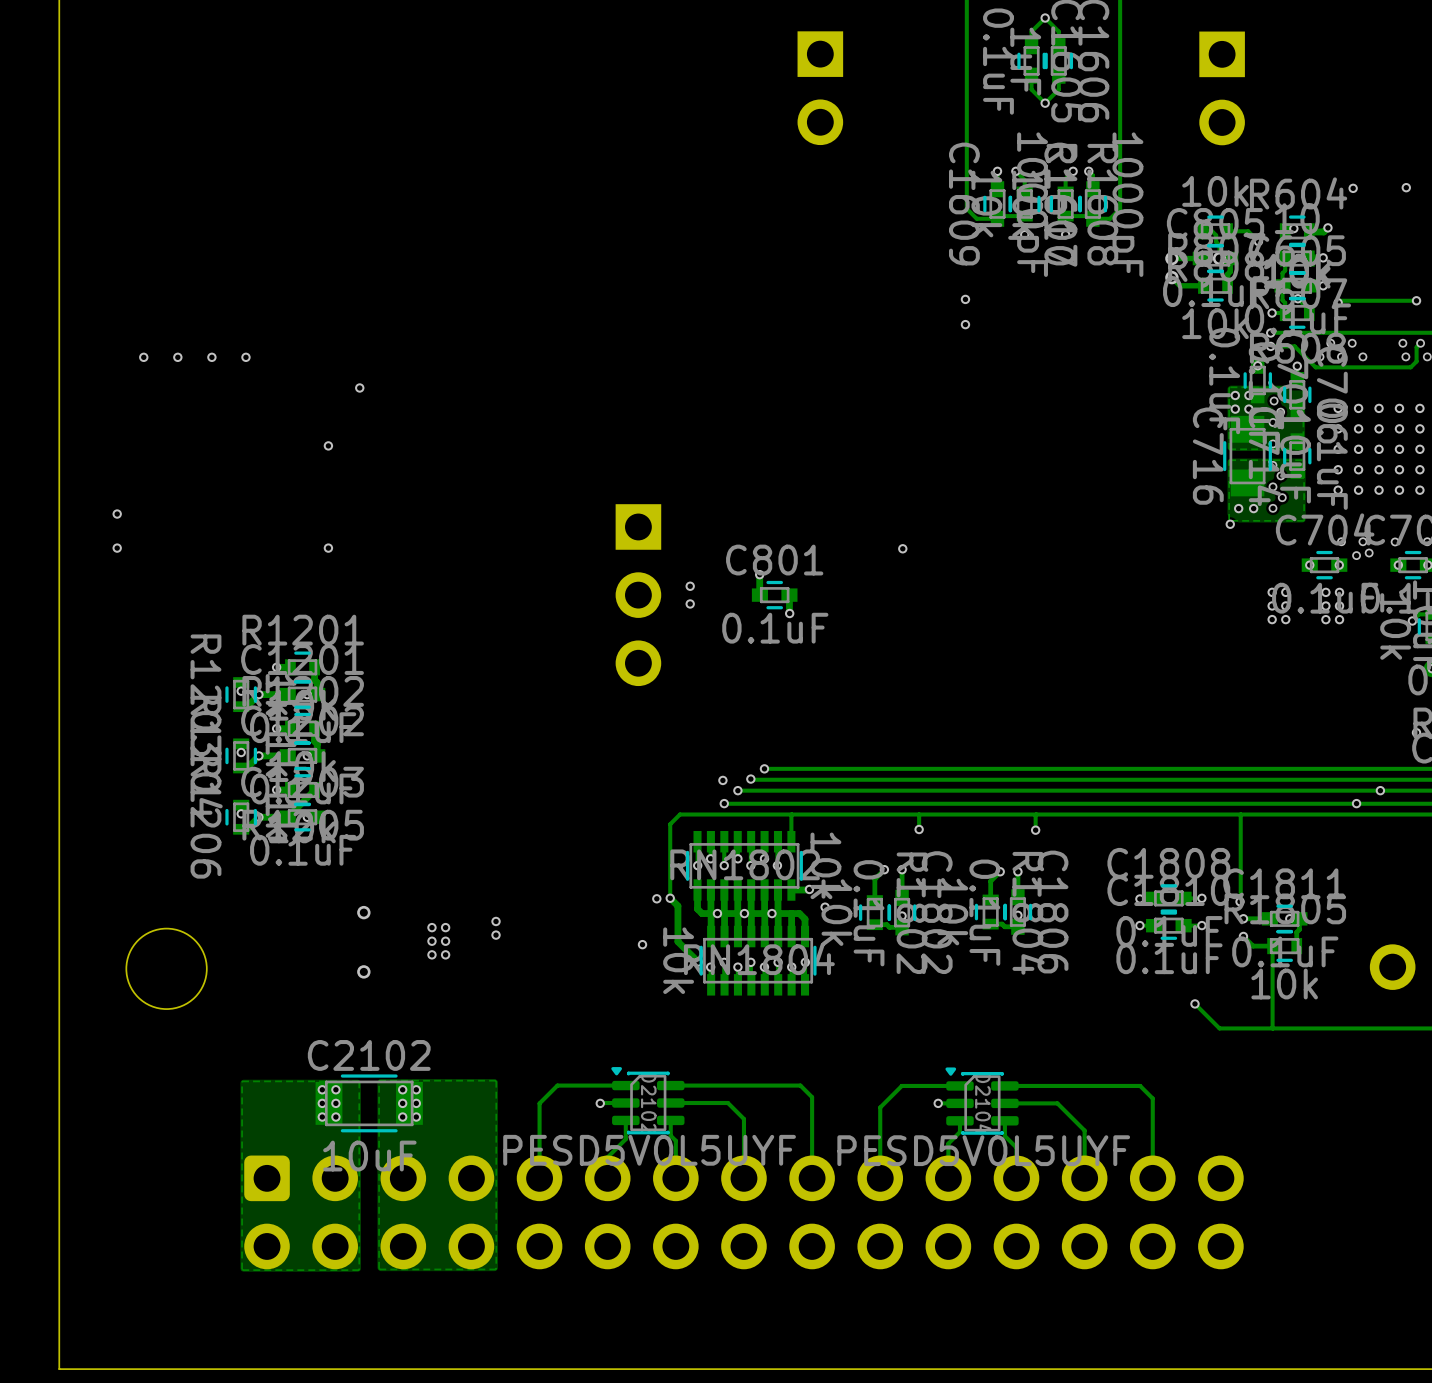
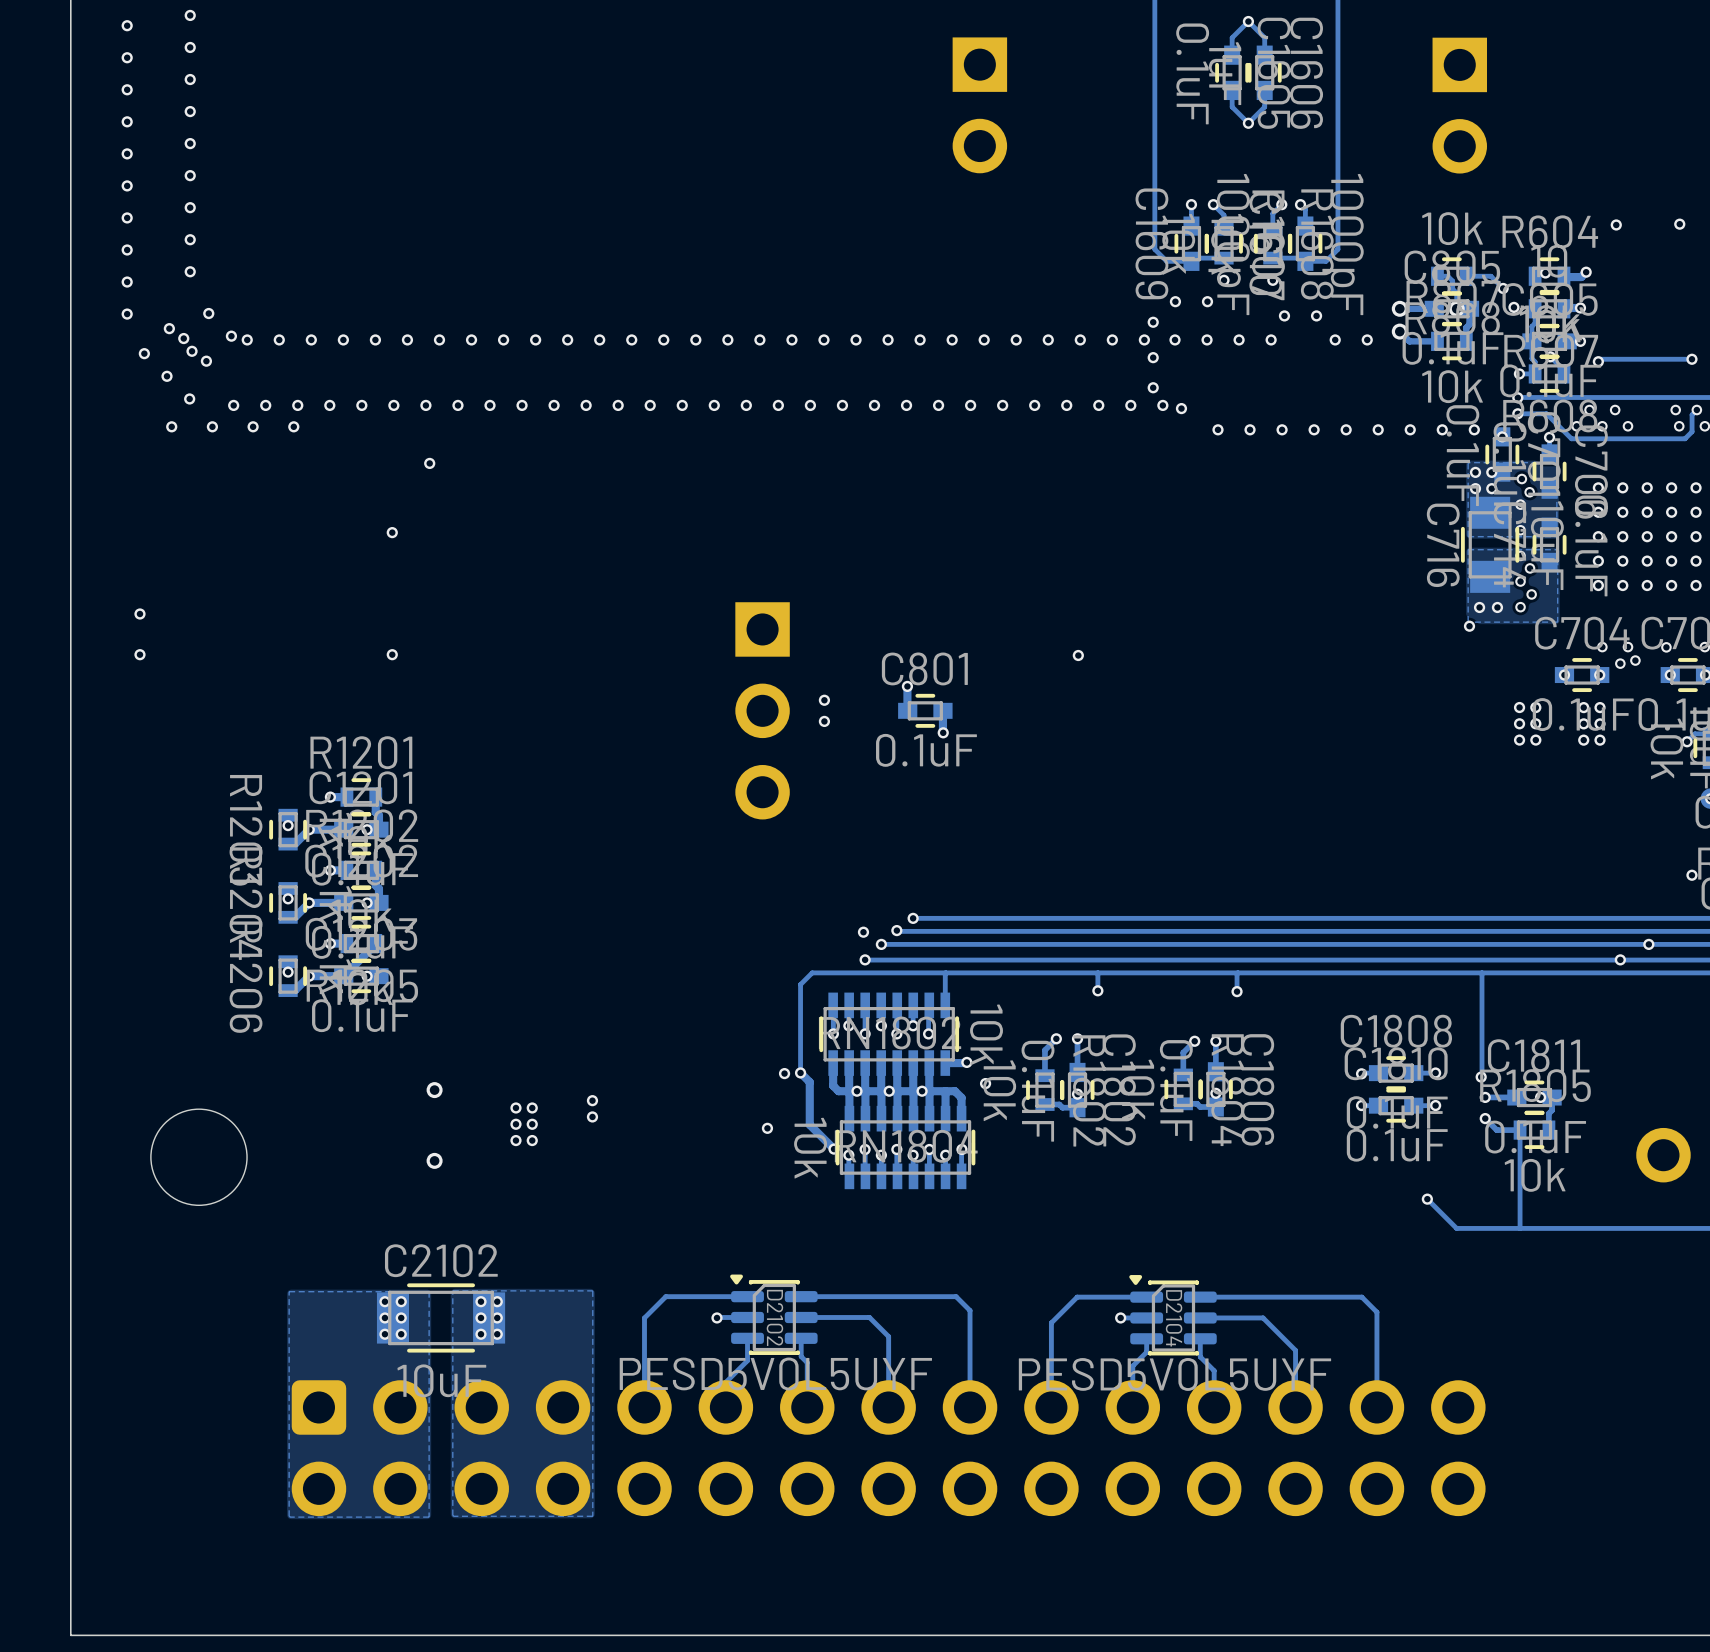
via: none -> (190, 15)
via: none -> (127, 25)
via: none -> (190, 47)
via: none -> (127, 57)
via: none -> (190, 79)
via: none -> (127, 89)
via: none -> (190, 111)
via: none -> (127, 121)
via: none -> (190, 143)
via: none -> (127, 153)
via: none -> (190, 175)
via: none -> (127, 185)
via: none -> (190, 207)
via: none -> (127, 217)
via: none -> (190, 239)
via: none -> (127, 249)
via: none -> (190, 271)
via: none -> (127, 282)
via: none -> (1175, 301)
via: none -> (1207, 301)
via: none -> (1513, 307)
via: none -> (127, 314)
via: none -> (208, 313)
via: none -> (1284, 315)
via: none -> (1316, 315)
via: none -> (1153, 322)
via: none -> (169, 328)
via: none -> (231, 336)
via: none -> (183, 338)
via: none -> (247, 339)
via: none -> (279, 339)
via: none -> (311, 339)
via: none -> (343, 339)
via: none -> (375, 339)
via: none -> (407, 339)
via: none -> (439, 339)
via: none -> (471, 339)
via: none -> (503, 339)
via: none -> (535, 339)
via: none -> (567, 339)
via: none -> (599, 339)
via: none -> (631, 339)
via: none -> (663, 339)
via: none -> (695, 339)
via: none -> (727, 339)
via: none -> (759, 339)
via: none -> (791, 339)
via: none -> (823, 339)
via: none -> (856, 339)
via: none -> (888, 339)
via: none -> (920, 339)
via: none -> (952, 339)
via: none -> (984, 339)
via: none -> (1016, 339)
via: none -> (1048, 339)
via: none -> (1080, 339)
via: none -> (1112, 339)
via: none -> (1144, 339)
via: none -> (1175, 339)
via: none -> (1207, 339)
via: none -> (1239, 339)
via: none -> (1271, 339)
via: none -> (1335, 339)
via: none -> (1367, 339)
via: none -> (192, 351)
via: none -> (144, 353)
via: none -> (206, 361)
via: none -> (167, 376)
via: none -> (189, 398)
via: none -> (233, 405)
via: none -> (265, 405)
via: none -> (297, 405)
via: none -> (329, 405)
via: none -> (361, 405)
via: none -> (393, 405)
via: none -> (425, 405)
via: none -> (457, 405)
via: none -> (490, 405)
via: none -> (522, 405)
via: none -> (554, 405)
via: none -> (586, 405)
via: none -> (618, 405)
via: none -> (650, 405)
via: none -> (682, 405)
via: none -> (714, 405)
via: none -> (746, 405)
via: none -> (778, 405)
via: none -> (810, 405)
via: none -> (842, 405)
via: none -> (874, 405)
via: none -> (906, 405)
via: none -> (938, 405)
via: none -> (970, 405)
via: none -> (1002, 405)
via: none -> (1034, 405)
via: none -> (1066, 405)
via: none -> (1098, 405)
via: none -> (1130, 405)
via: none -> (1162, 405)
via: none -> (1181, 408)
via: none -> (1218, 429)
via: none -> (1250, 429)
via: none -> (1282, 429)
via: none -> (1314, 429)
via: none -> (1346, 429)
via: none -> (1378, 429)
via: none -> (1410, 429)
via: none -> (1442, 429)
via: none -> (1474, 429)

